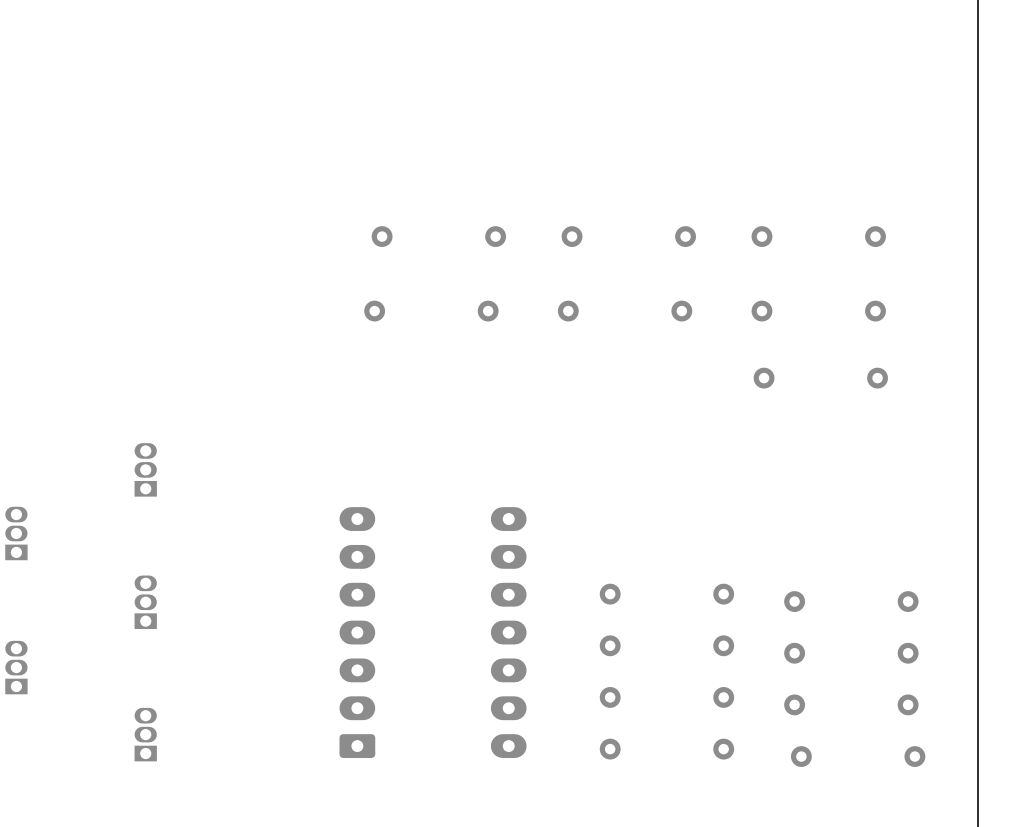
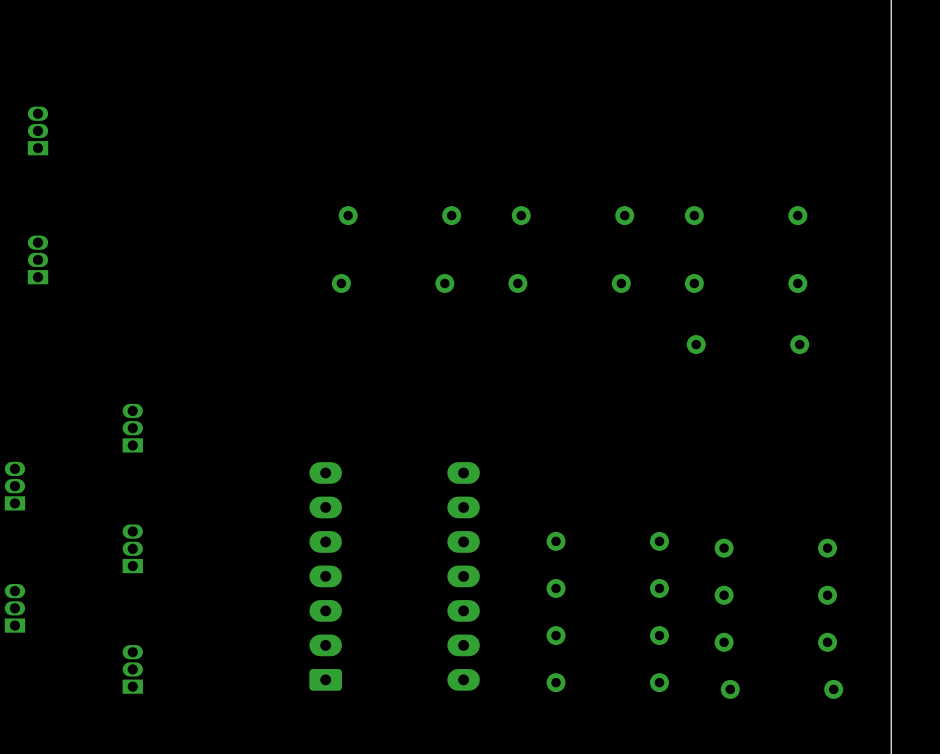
part: none -> (38, 130)
part: none -> (38, 259)

